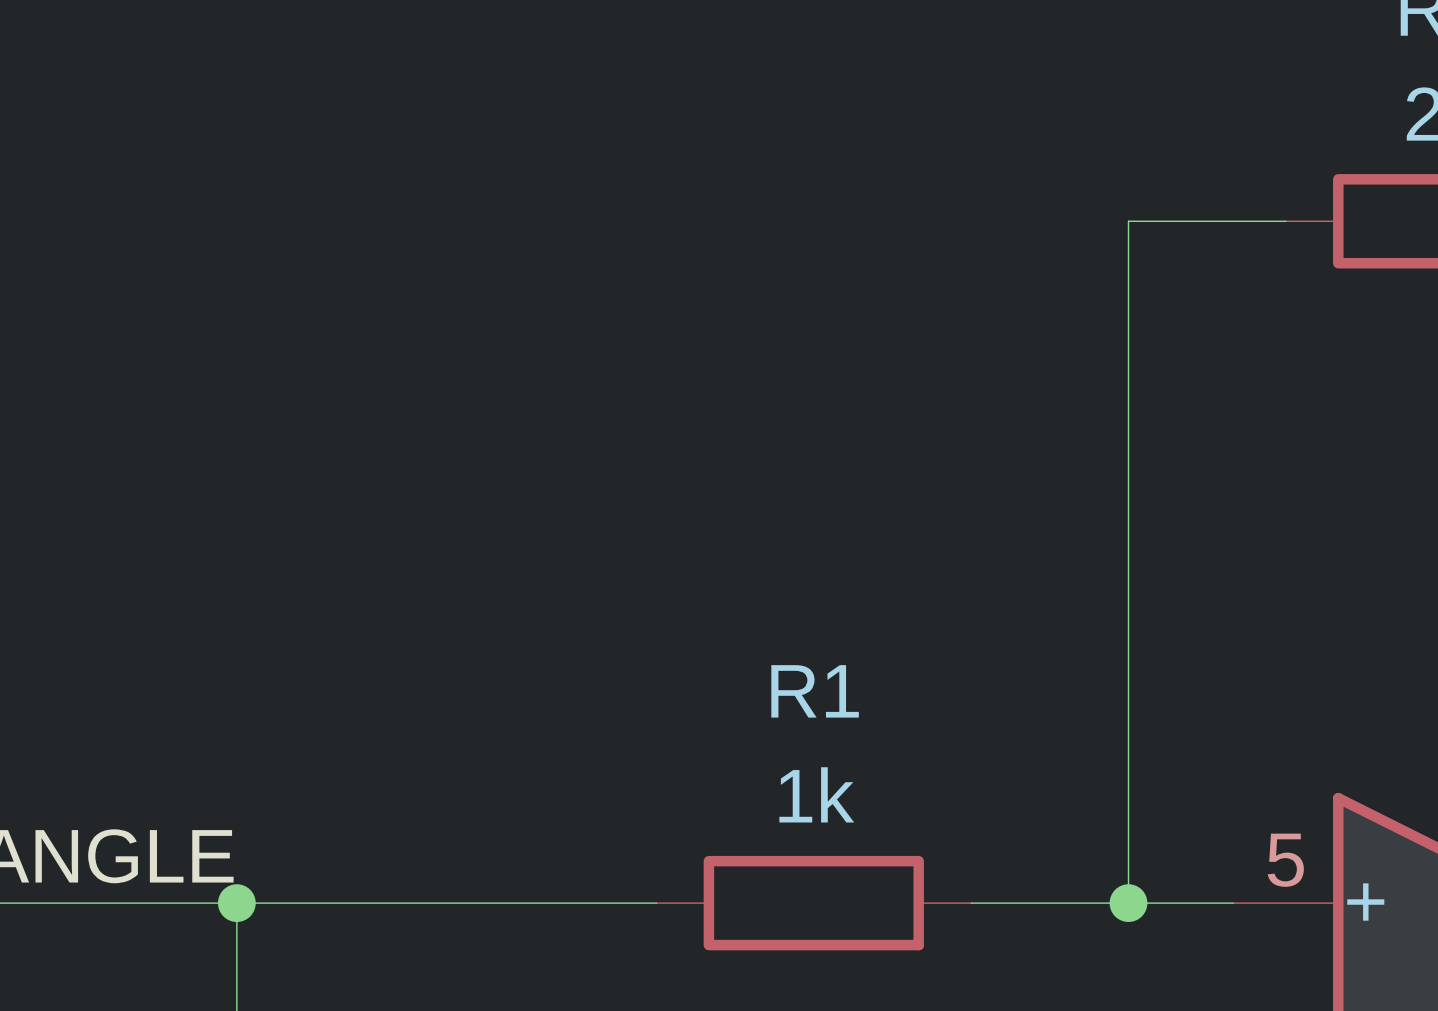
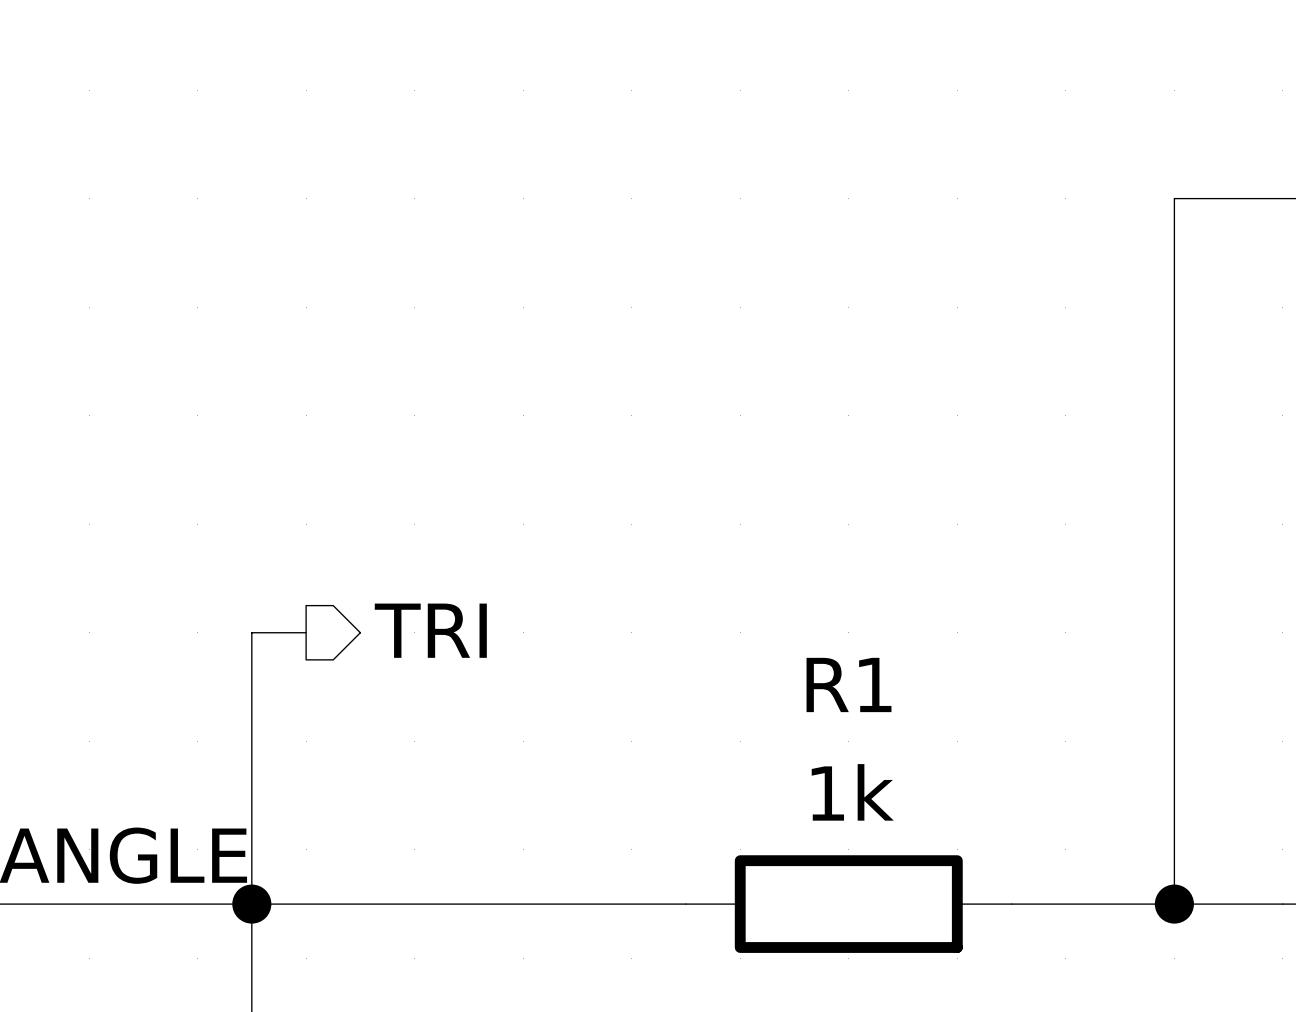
hierarchical label: none -> TRI (430, 630)
wire: none -> (306, 632) (251, 632) (251, 904)

